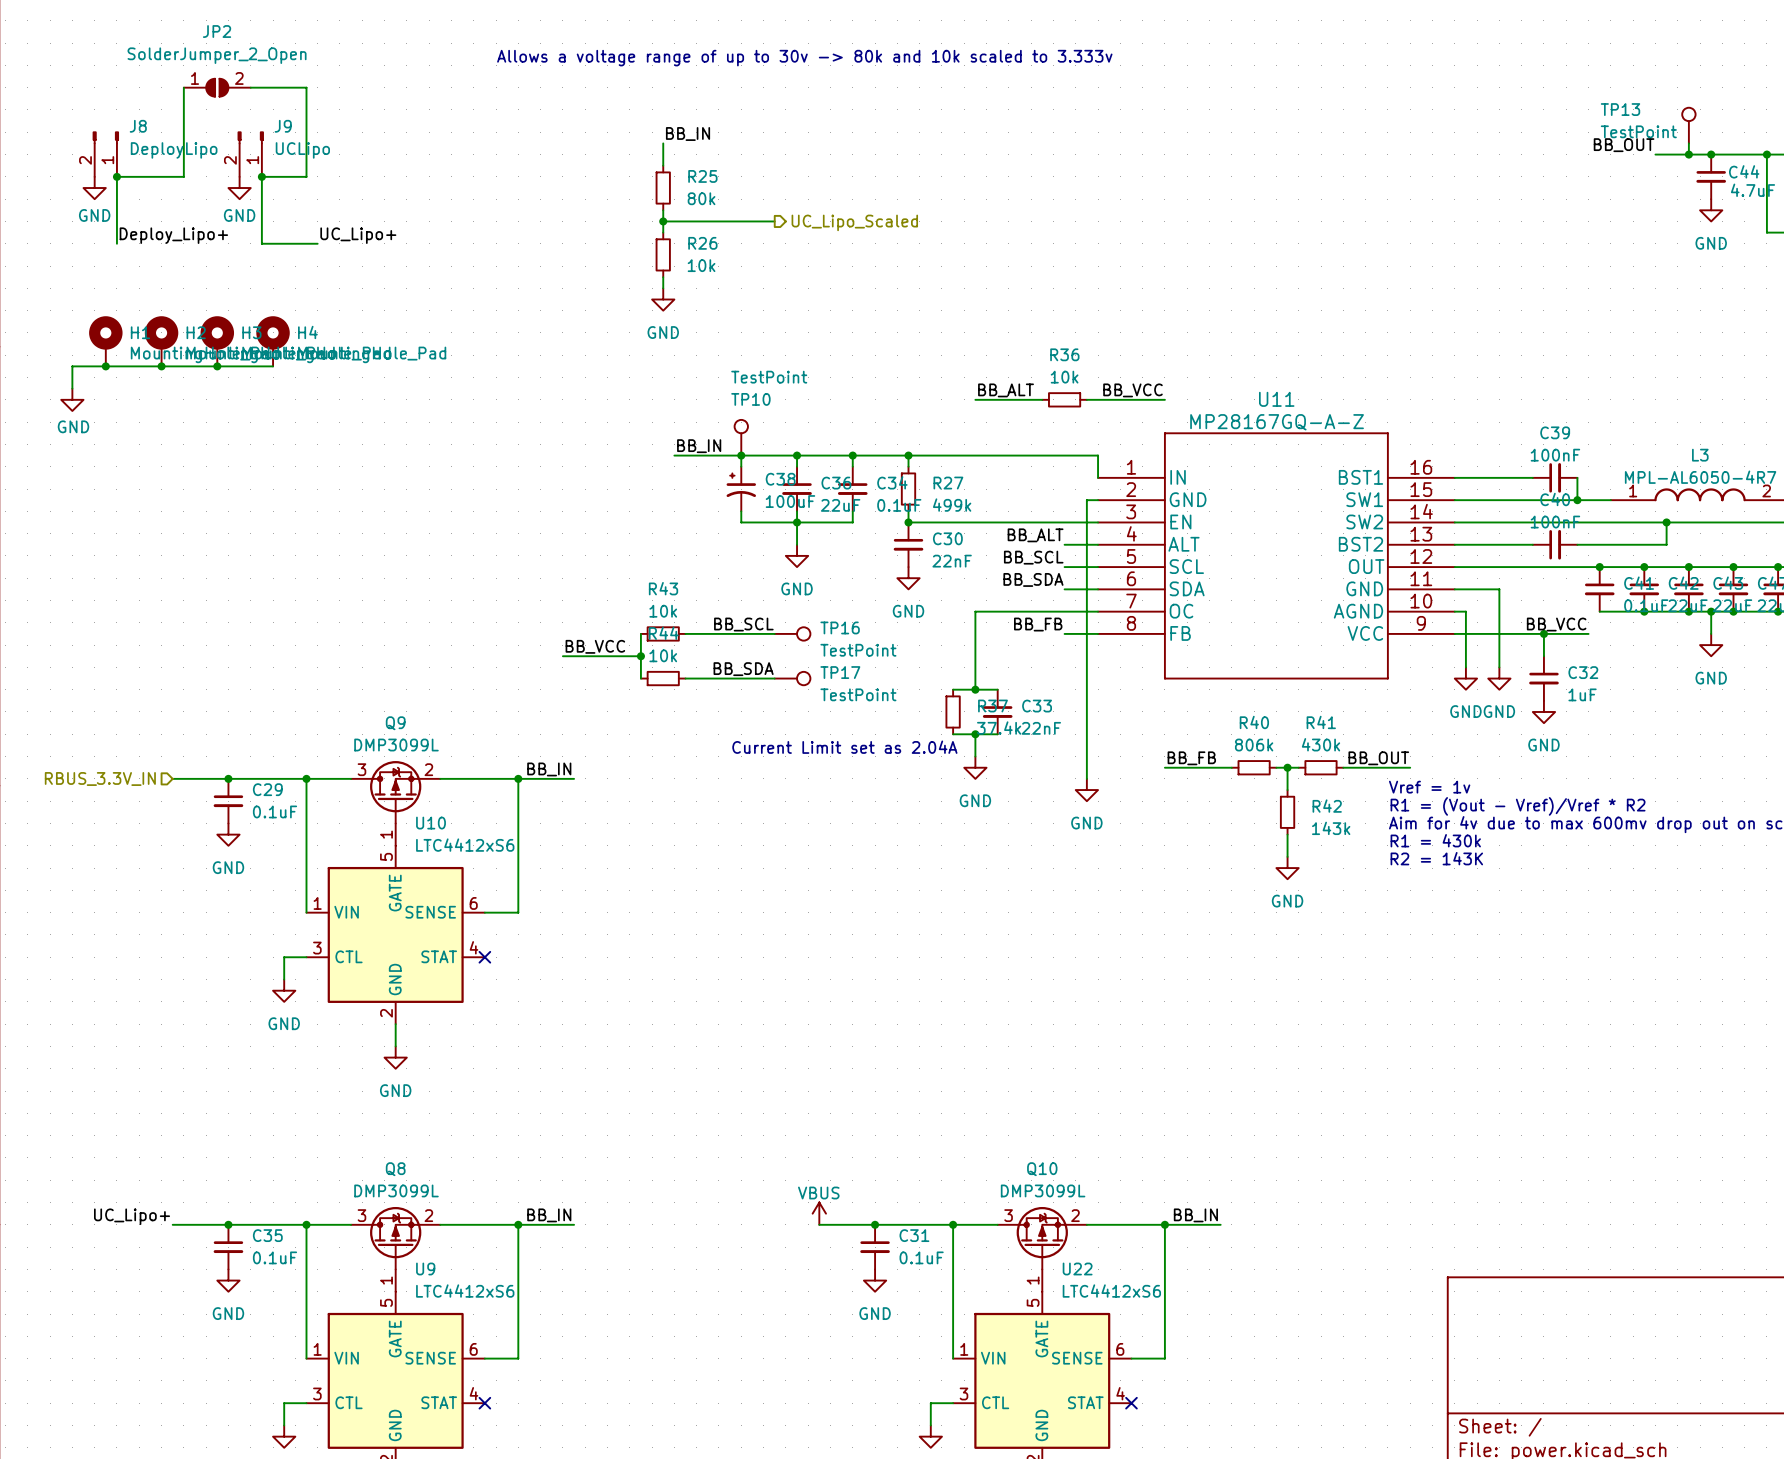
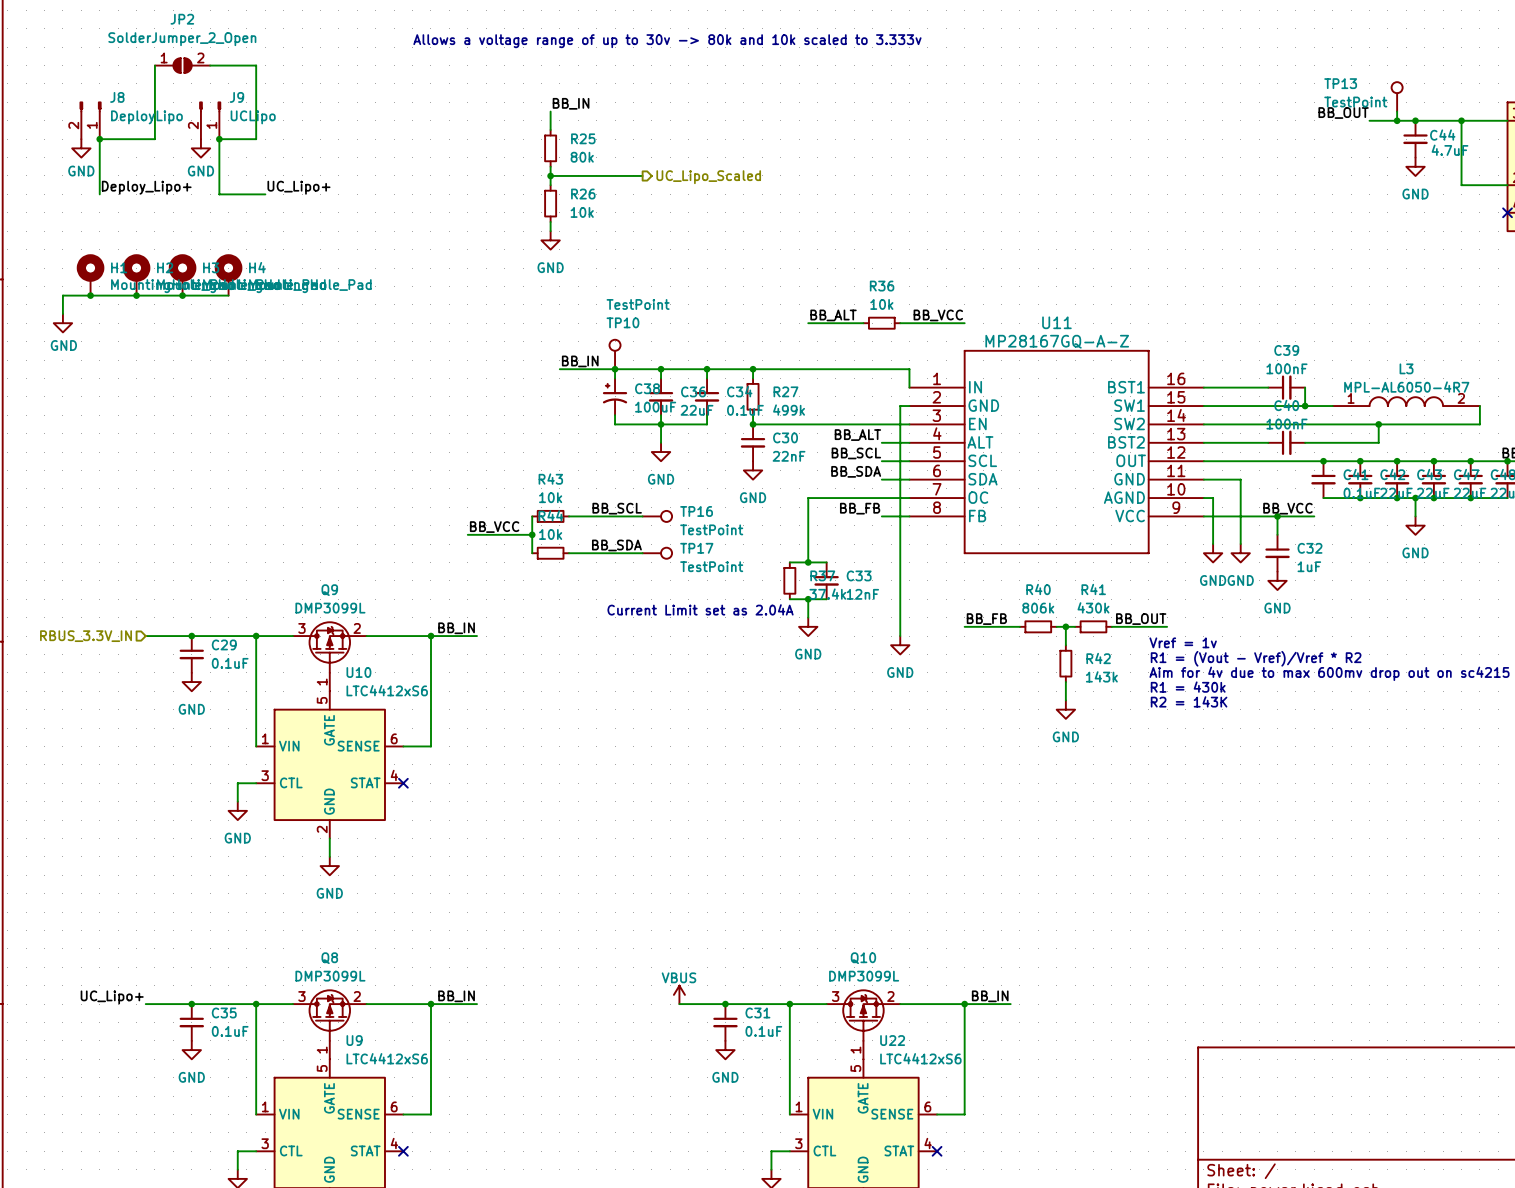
C33 value: 22nF (1041, 728) -> 12nF (862, 594)

